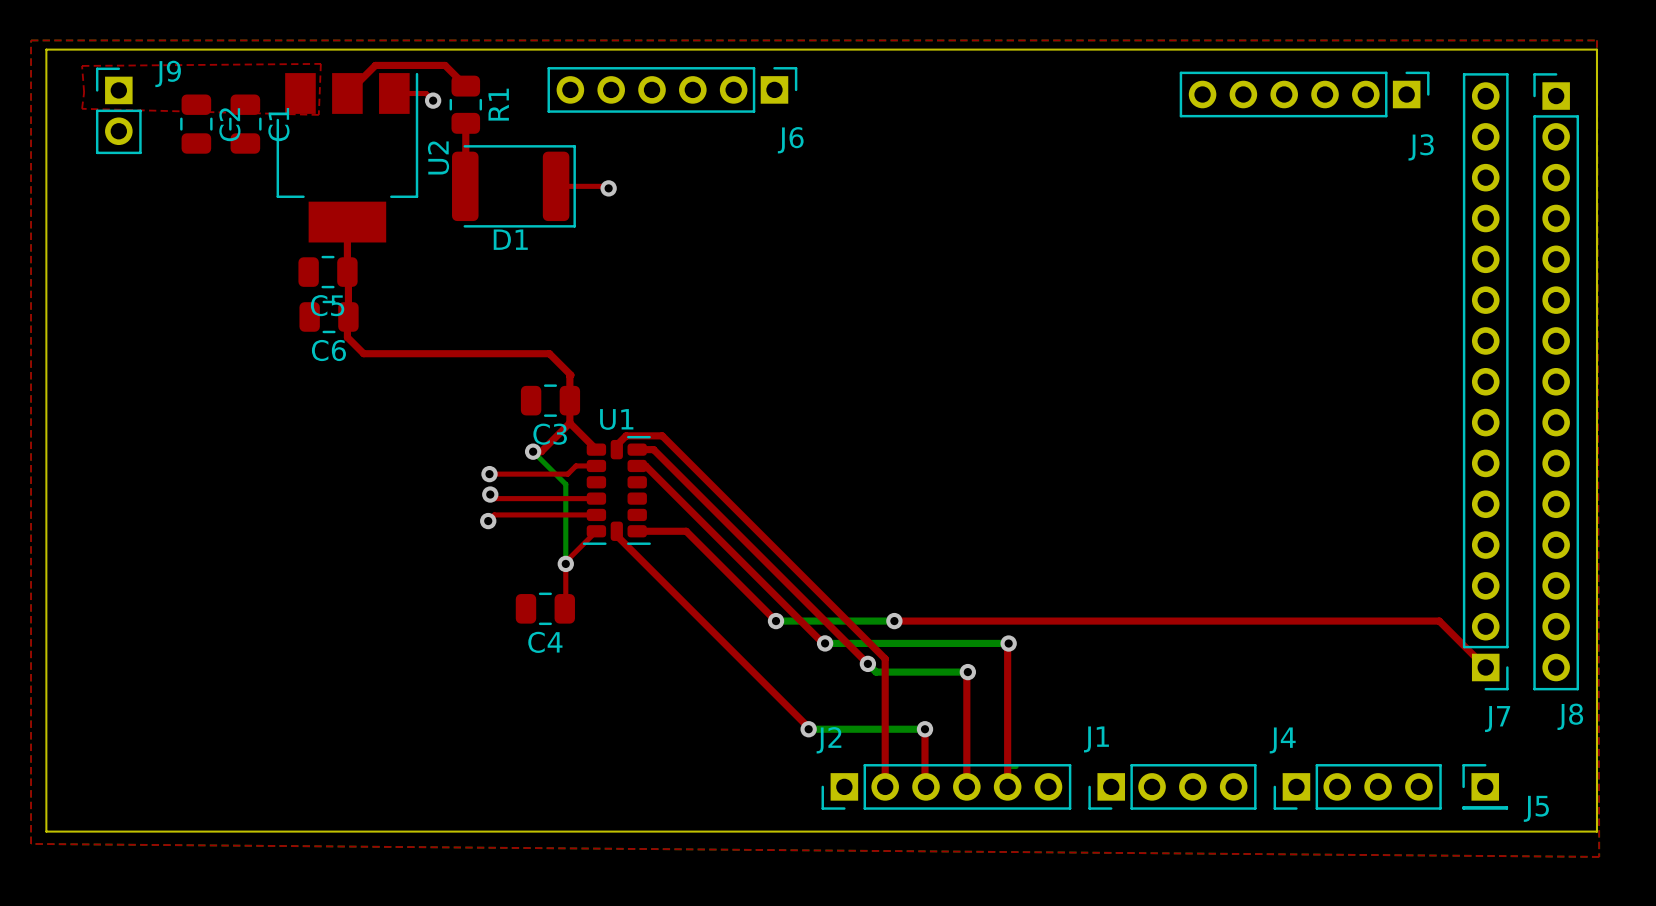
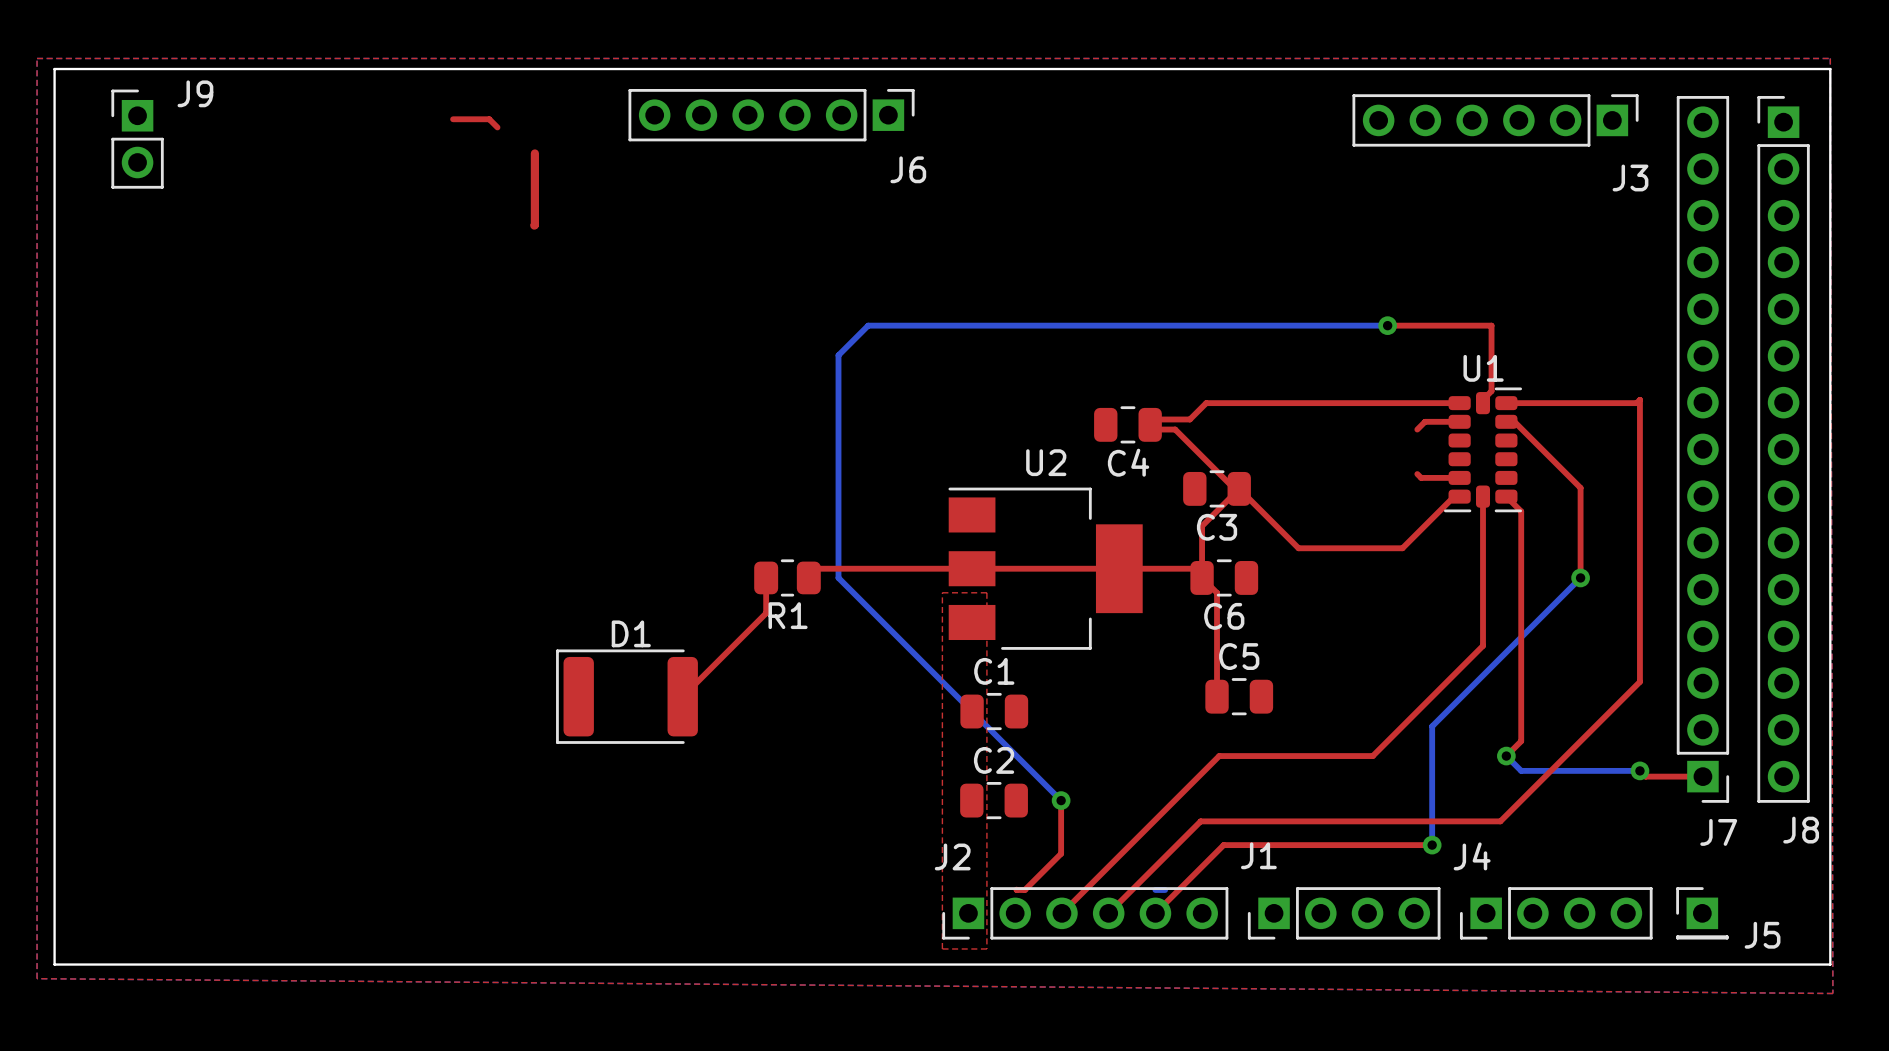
top zone outline: (320, 63) (82, 65) (84, 92) (82, 108) (318, 114) (320, 63) -> none
top track: (465, 86) (445, 65) (375, 65) (347, 93) -> none
via: (433, 100) -> none
R1 rotation: 0° (465, 104) -> 90° clockwise (787, 577)
R1 position: (465, 104) -> (787, 577)
C2 rotation: 0° (196, 124) -> 90° clockwise (994, 800)
C2 position: (196, 124) -> (994, 800)
C2 name position: C2 (229, 124) -> C2 (994, 760)
C1 rotation: 0° (245, 124) -> 90° clockwise (994, 711)
C1 position: (245, 124) -> (994, 711)
C1 name position: C1 (278, 124) -> C1 (994, 671)
U2 rotation: 0° (347, 157) -> 90° counterclockwise (1045, 568)
U2 position: (347, 157) -> (1045, 568)
D1 rotation: 0° (513, 186) -> 180° (626, 696)
D1 position: (513, 186) -> (626, 696)
top track: (556, 186) (606, 186) (608, 188) -> none
via: (608, 188) -> none
top track: (347, 222) (347, 337) (363, 353) (549, 353) (570, 375) (569, 423) -> none
C5 position: (328, 272) -> (1239, 696)
bottom track: none -> (1387, 325) (868, 325) (838, 355) (838, 577) (1061, 800)
top track: none -> (1387, 325) (1491, 325) (1491, 391) (1483, 399) (1483, 403)
via: none -> (1387, 325)
C5 name position: C5 (327, 305) -> C5 (1239, 656)
C6 position: (329, 316) -> (1224, 577)
top track: none -> (1459, 403) (1206, 403) (1189, 419) (1155, 419) (1150, 424)
top track: none -> (1459, 421) (1425, 421) (1417, 429)
top track: none -> (1506, 421) (1514, 421) (1580, 487) (1580, 577)
top track: none -> (1150, 429) (1175, 429) (1239, 493)
C3 position: (550, 400) -> (1217, 488)
top track: none -> (1417, 474) (1421, 477) (1459, 477)
top track: (569, 423) (596, 449) -> none
top track: (569, 423) (541, 451) (533, 451) -> none
top track: none -> (1459, 496) (1454, 496) (1402, 548) (1298, 548) (1239, 488) (1202, 526) (1202, 577)
top track: none -> (1506, 496) (1521, 511) (1521, 741) (1506, 756)
top track: (616, 449) (616, 445) (626, 435) (662, 435) (885, 658) (885, 786) -> none
top track: (637, 449) (653, 449) (867, 663) -> none
bottom track: (533, 451) (565, 484) (565, 563) -> none
via: (533, 451) -> none
top track: (596, 465) (575, 465) (567, 474) (489, 474) -> none
top track: (637, 465) (645, 465) (825, 643) -> none
via: (489, 474) -> none
U1 position: (616, 490) -> (1483, 449)
top track: (490, 494) (494, 498) (596, 498) -> none
via: (490, 494) -> none
top track: none -> (766, 577) (766, 613) (682, 696)
top track: none -> (808, 577) (818, 568) (1192, 568) (1217, 592) (1217, 696)
bottom track: none -> (1580, 577) (1432, 726) (1432, 845)
via: none -> (1580, 577)
top zone outline: none -> (942, 592) (942, 948) (986, 948) (986, 592) (942, 592)
top track: (596, 514) (494, 514) (488, 521) -> none
via: (488, 521) -> none
top track: (596, 531) (565, 561) (564, 608) -> none
top track: (616, 531) (616, 535) (808, 729) -> none
top track: (637, 531) (686, 531) (776, 621) -> none
via: (565, 563) -> none
C4 position: (545, 608) -> (1127, 424)
bottom track: (776, 621) (894, 621) -> none
via: (776, 621) -> none
top track: (894, 621) (1439, 621) (1485, 667) -> (1639, 770) (1645, 776) (1702, 776)
via: (894, 621) -> none
bottom track: (825, 643) (1008, 643) -> none
via: (825, 643) -> none
top track: (1008, 643) (1007, 786) -> (1432, 845) (1223, 845) (1155, 913)
via: (1008, 643) -> none
bottom track: none -> (1506, 756) (1521, 770) (1639, 770)
via: none -> (1506, 756)
via: none -> (1639, 770)
bottom track: (867, 663) (876, 672) (967, 672) -> none
via: (867, 663) -> none
top track: (967, 672) (966, 786) -> (1506, 403) (1636, 403) (1639, 399) (1639, 681) (1500, 821) (1200, 821) (1108, 913)
via: (967, 672) -> none
top track: none -> (1061, 800) (1061, 853) (1024, 889) (1016, 889)
via: none -> (1061, 800)
via: none -> (1432, 845)
bottom track: (808, 729) (924, 729) -> none
via: (808, 729) -> none
top track: (924, 729) (926, 786) -> (1483, 496) (1483, 645) (1372, 756) (1219, 756) (1061, 913)
via: (924, 729) -> none

